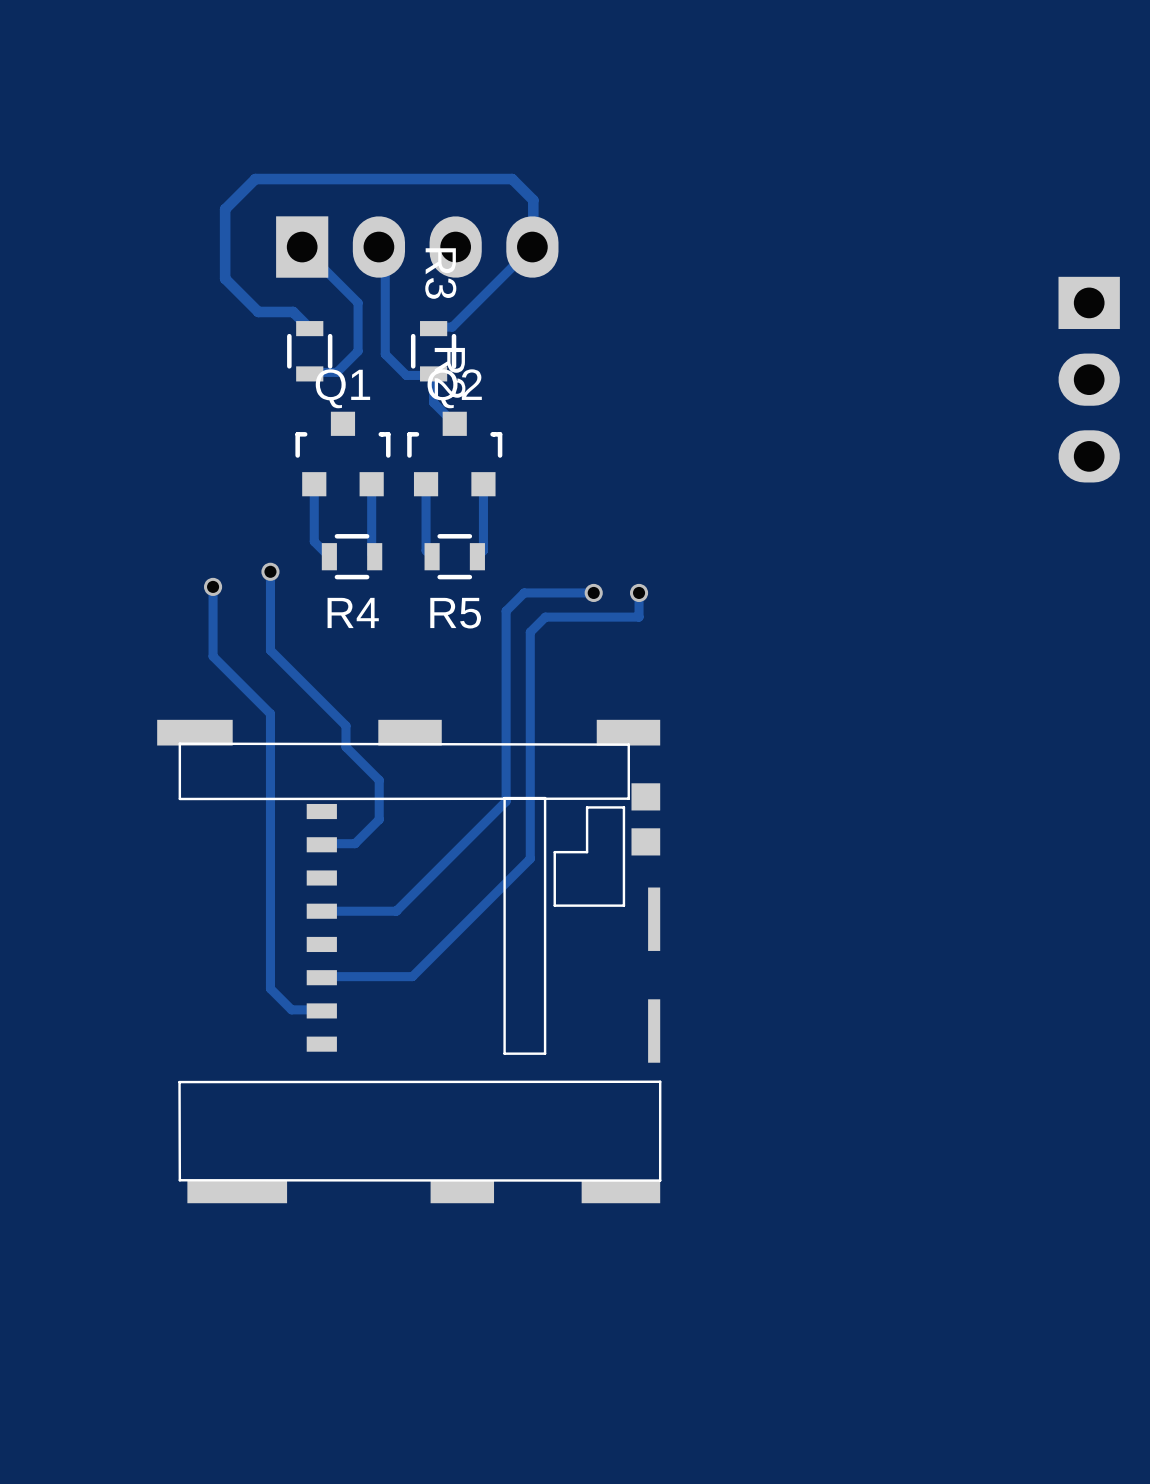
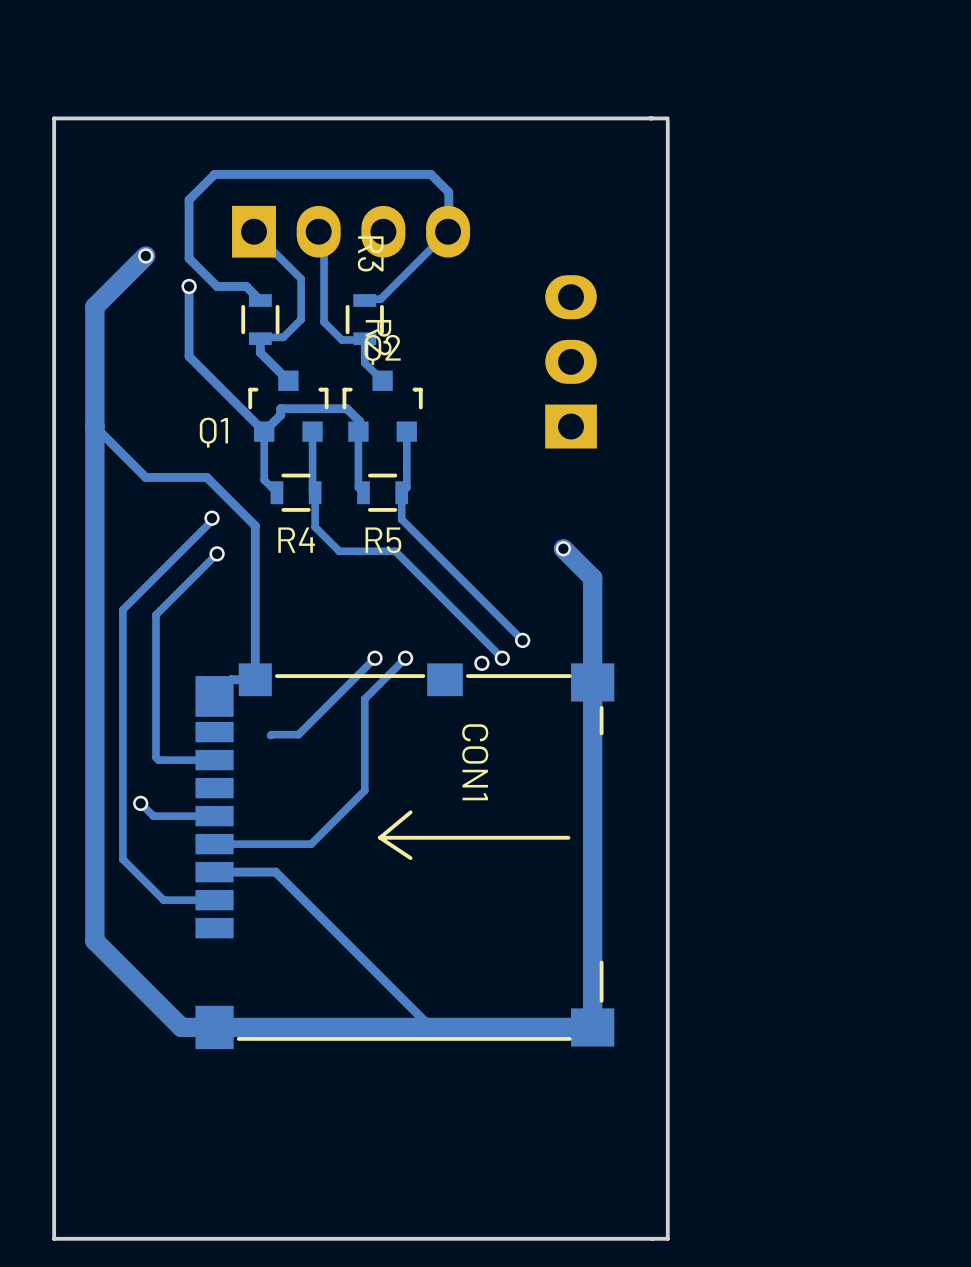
board edge: none -> (667, 118) (54, 118) (54, 1238) (667, 1238) (667, 120)
track: none -> (145, 255) (94, 306) (94, 940) (181, 1027) (592, 1027) (592, 578) (563, 548)
via: none -> (145, 255)
track: none -> (189, 286) (189, 356) (264, 431) (280, 415) (280, 408) (346, 408) (359, 421) (358, 431)
via: none -> (189, 286)
track: none -> (260, 338) (260, 352) (288, 380)
part rotation: 0° (1089, 379) -> 180° (571, 361)
part position: (1089, 379) -> (571, 361)
Q1 name position: Q1 (342, 388) -> Q1 (213, 432)
track: none -> (94, 426) (145, 477) (206, 477) (255, 525) (255, 679) (231, 679) (214, 696)
track: none -> (315, 492) (315, 527) (339, 551) (395, 551) (502, 658)
track: none -> (401, 492) (401, 519) (522, 640)
track: (270, 571) (270, 650) (345, 725) (345, 747) (379, 780) (379, 819) -> (374, 658) (318, 714)
via position: (270, 571) -> (212, 518)
track: (213, 586) (213, 656) (270, 713) (270, 988) (291, 1009) (321, 1010) -> none
via: (213, 586) -> none
track: none -> (212, 518) (212, 520) (122, 609) (122, 859) (163, 900) (214, 900)
track: (593, 592) (524, 592) (506, 611) (506, 801) (396, 911) (321, 911) -> none
via: (593, 592) -> none
track: (639, 592) (639, 617) (545, 617) (530, 632) (530, 858) (412, 976) (321, 977) -> none
via: (639, 592) -> none
via: none -> (563, 548)
track: none -> (217, 553) (155, 614) (155, 757) (158, 760) (214, 760)
via: none -> (217, 553)
via: none -> (522, 640)
via: none -> (374, 658)
track: none -> (405, 658) (364, 698) (364, 790) (311, 844) (214, 844)
via: none -> (405, 658)
via: none -> (502, 658)
via: none -> (481, 663)
track: none -> (140, 803) (153, 816) (214, 816)
via: none -> (140, 803)
part: (409, 961) -> none
CON1: none -> (404, 856)
track: none -> (214, 872) (275, 872) (430, 1027)

